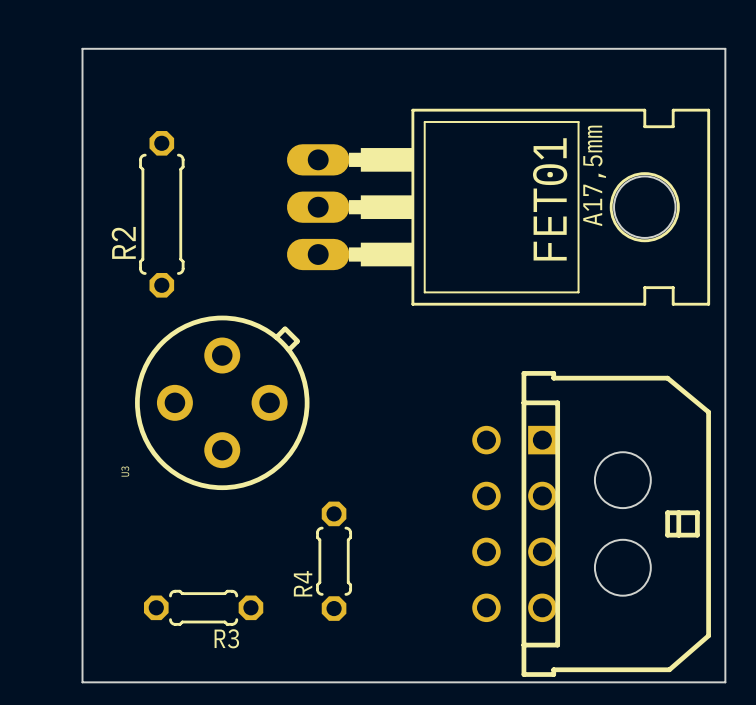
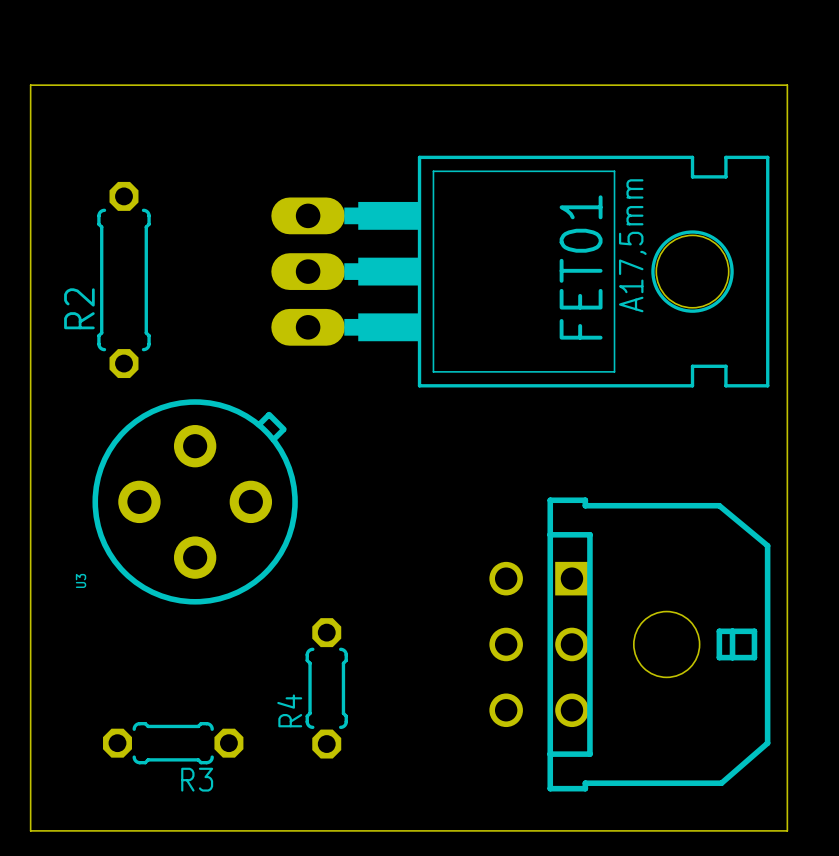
part footprint: [472, 371, 711, 677] -> [489, 497, 771, 792]

